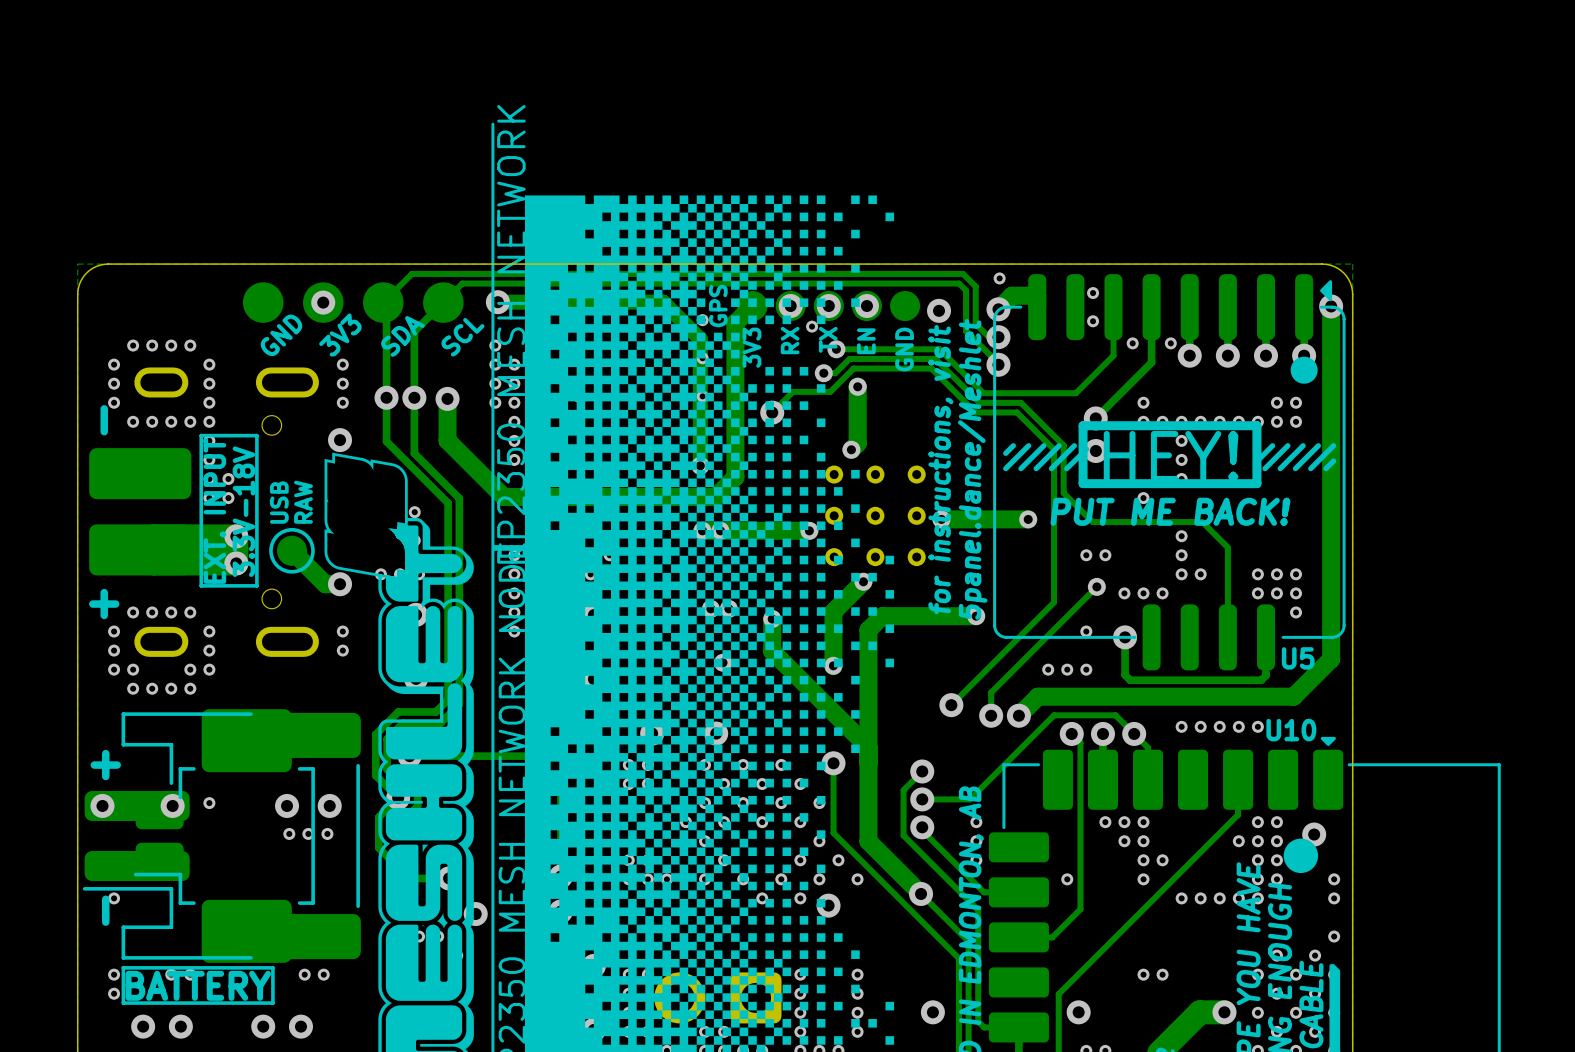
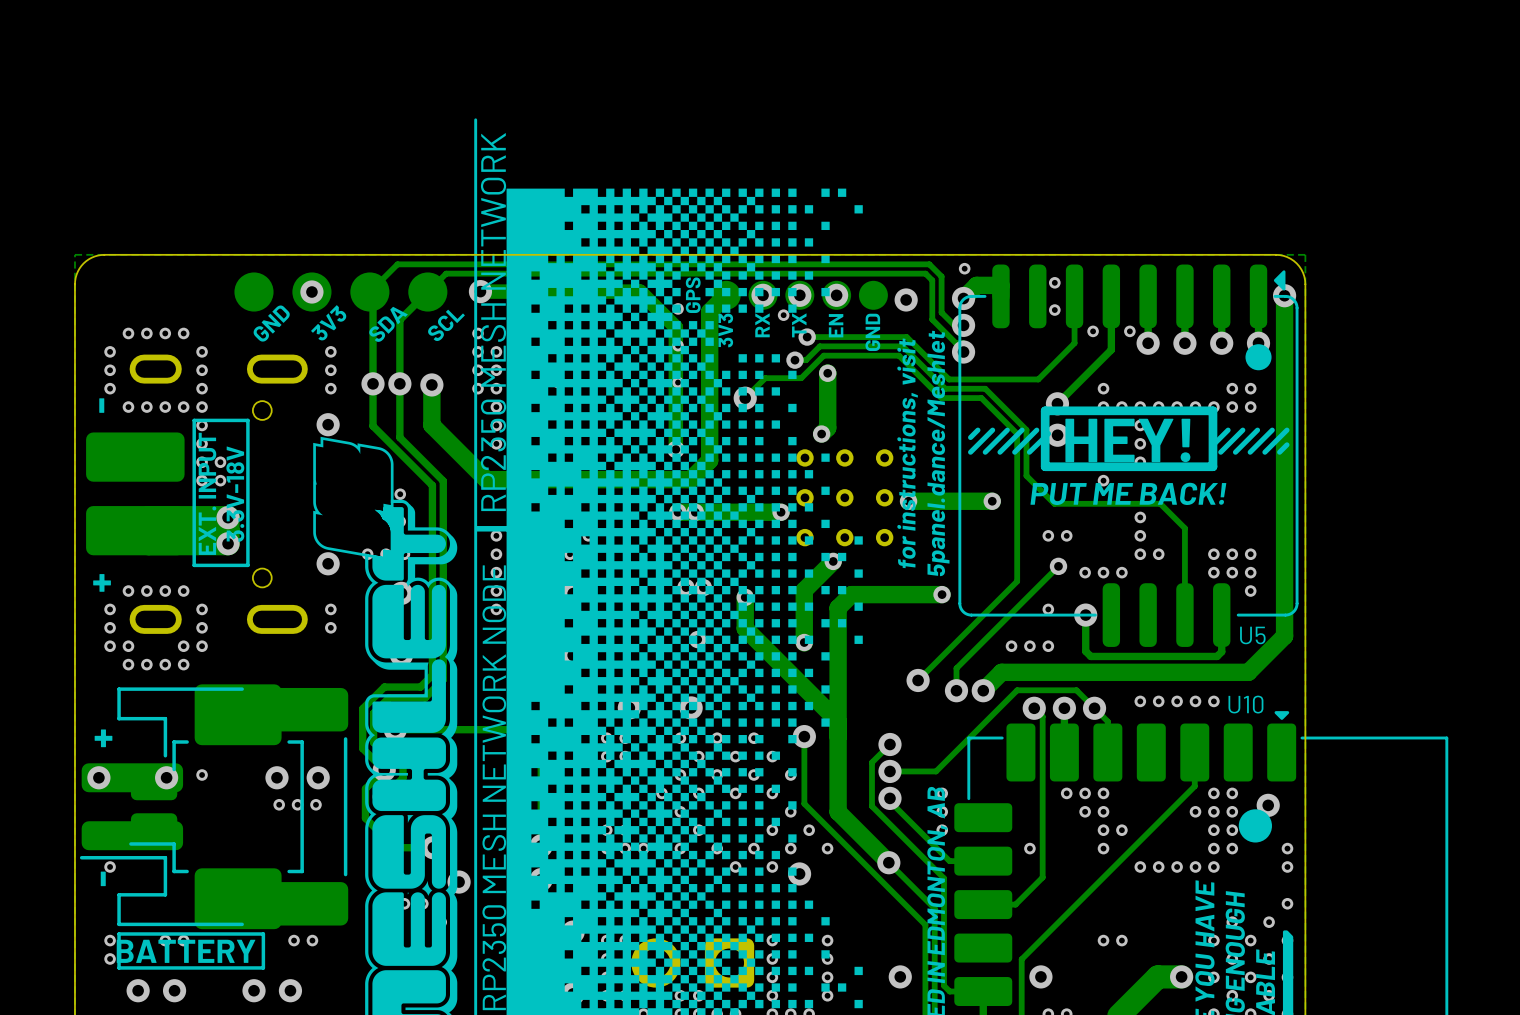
text: USB (279, 502) -> none
text: RAW (303, 502) -> none
track: (291, 550) (325, 584) (340, 584) -> none
part: (291, 550) -> none

